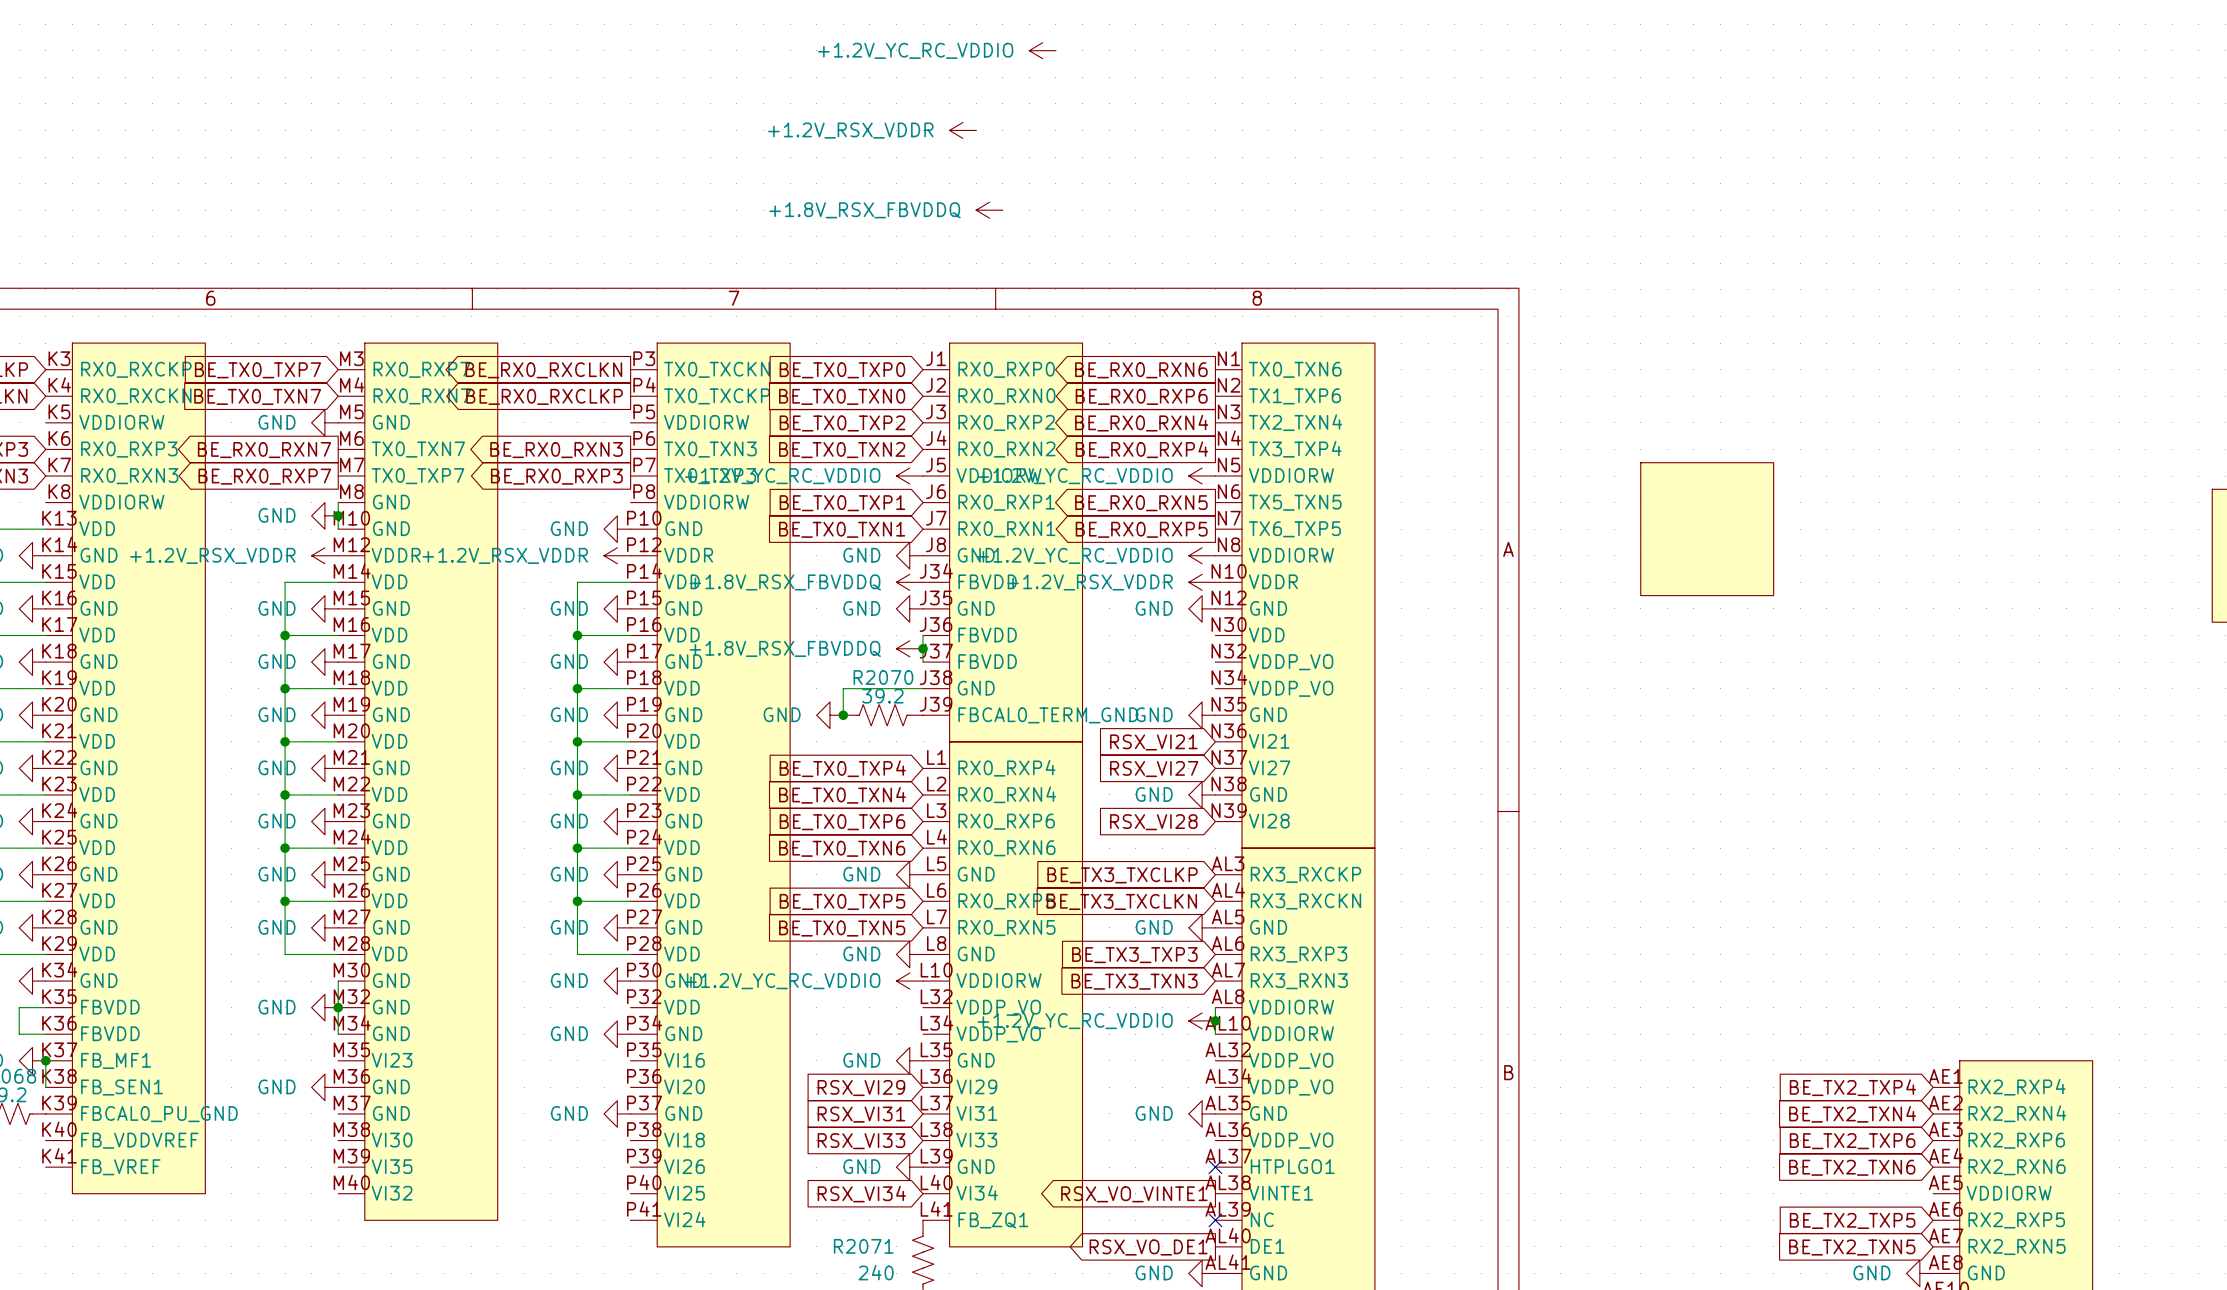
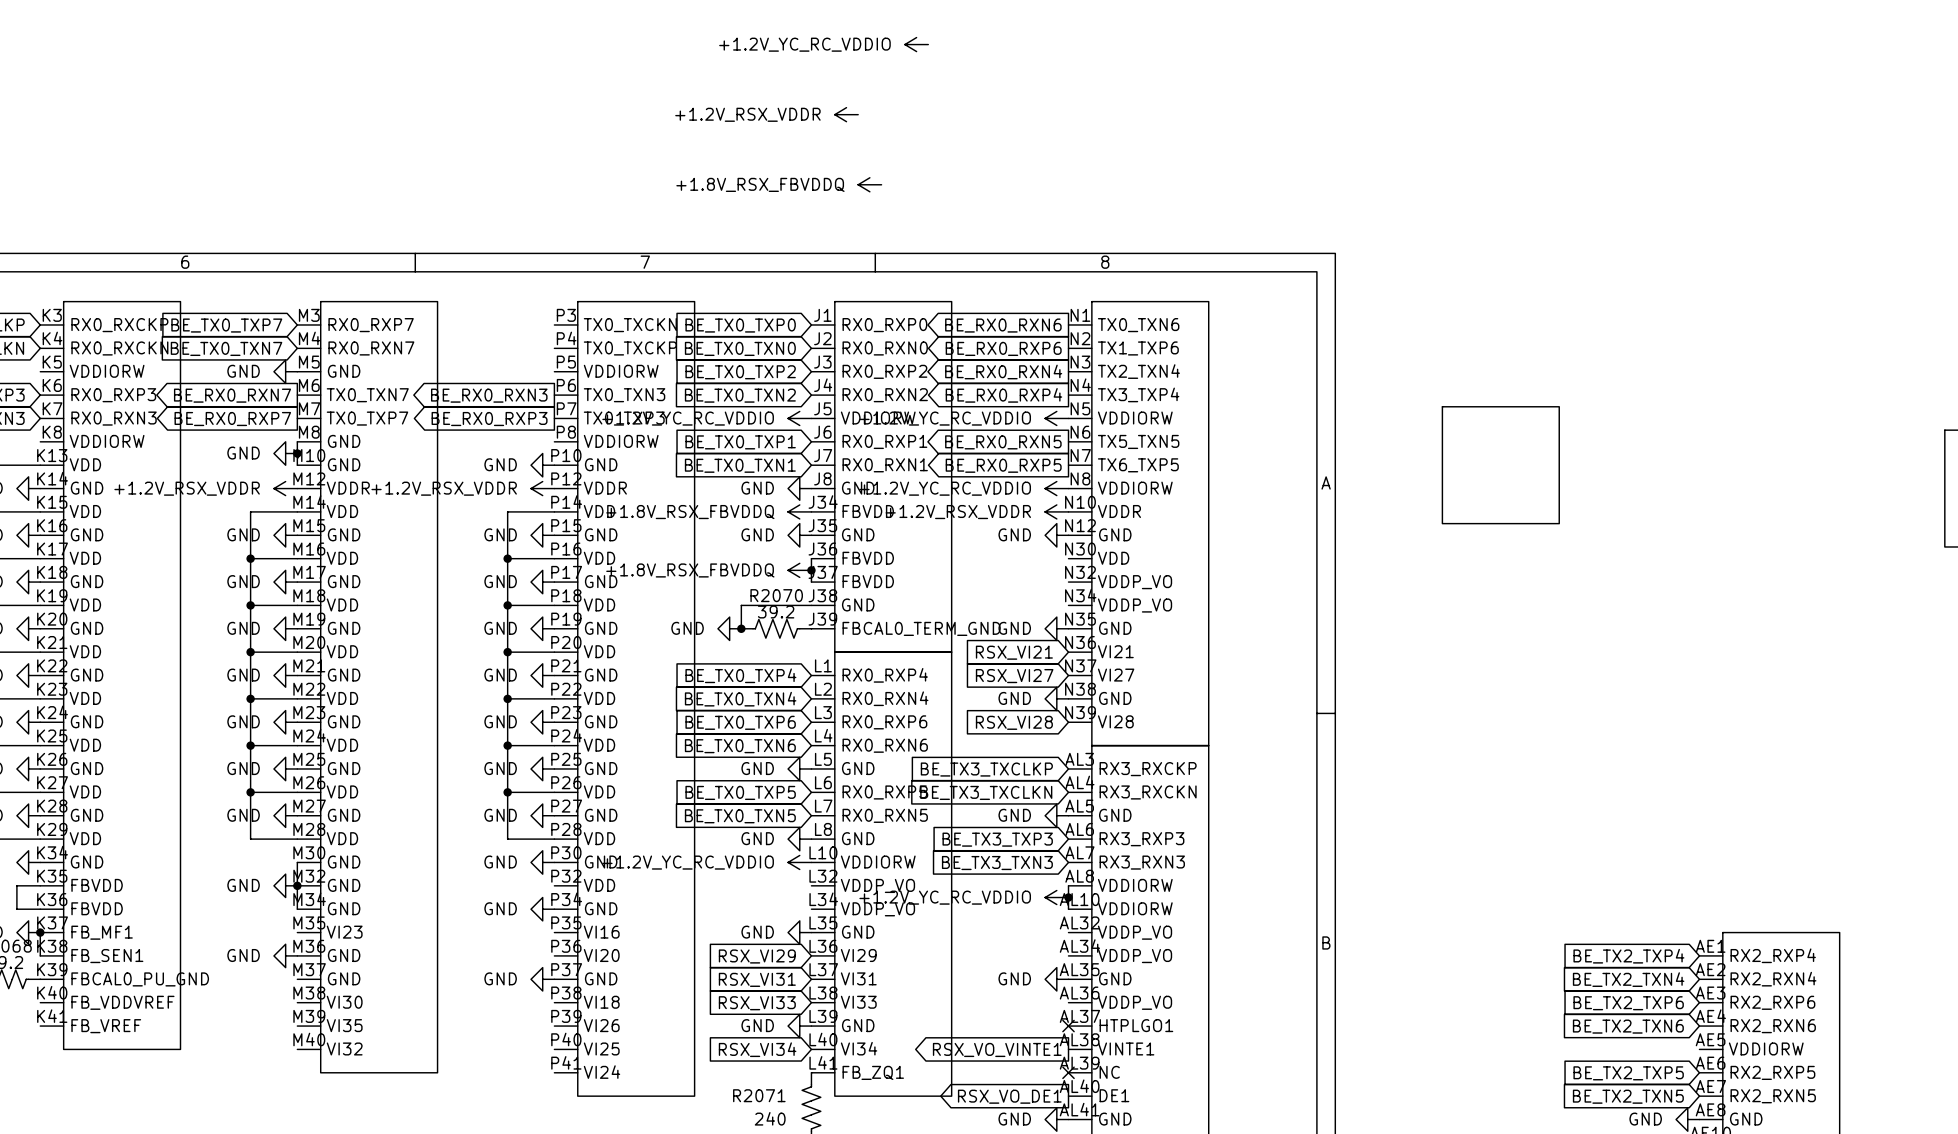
global label: BE_RX0_RXCLKN (543, 370) -> none
global label: BE_RX0_RXCLKP (544, 396) -> none

